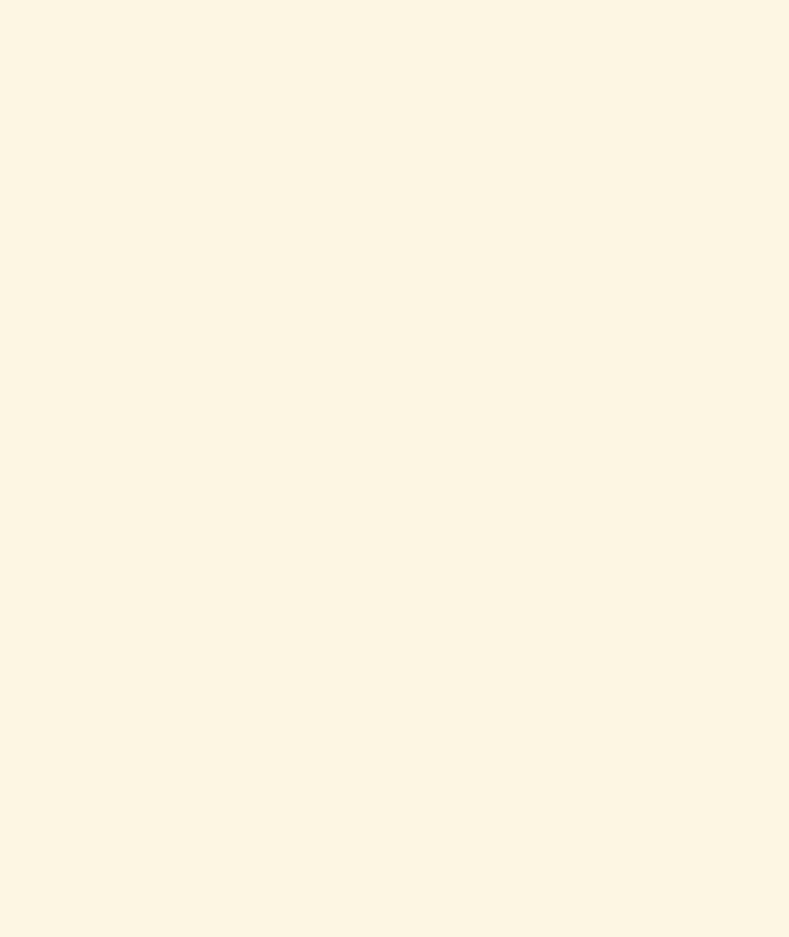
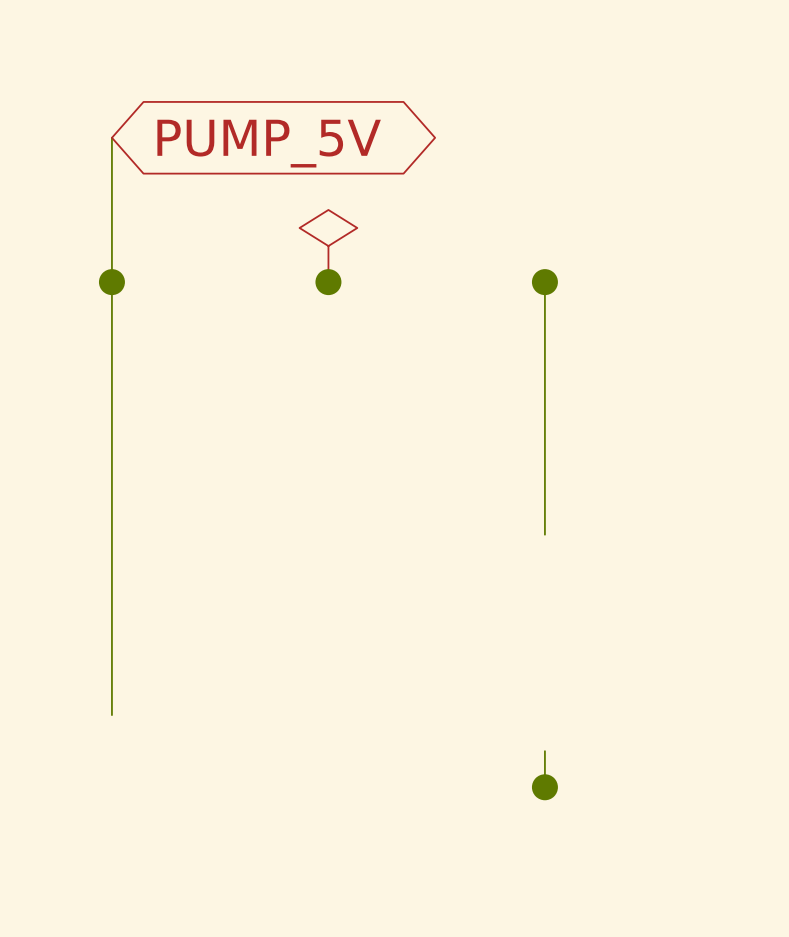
wire: none -> (111, 137) (111, 715)
global label: none -> PUMP_5V (269, 143)
power symbol: none -> (328, 246)
junction: none -> (111, 282)
junction: none -> (328, 282)
wire: none -> (544, 282) (544, 534)
junction: none -> (544, 282)
wire: none -> (544, 751) (544, 787)
junction: none -> (544, 787)

